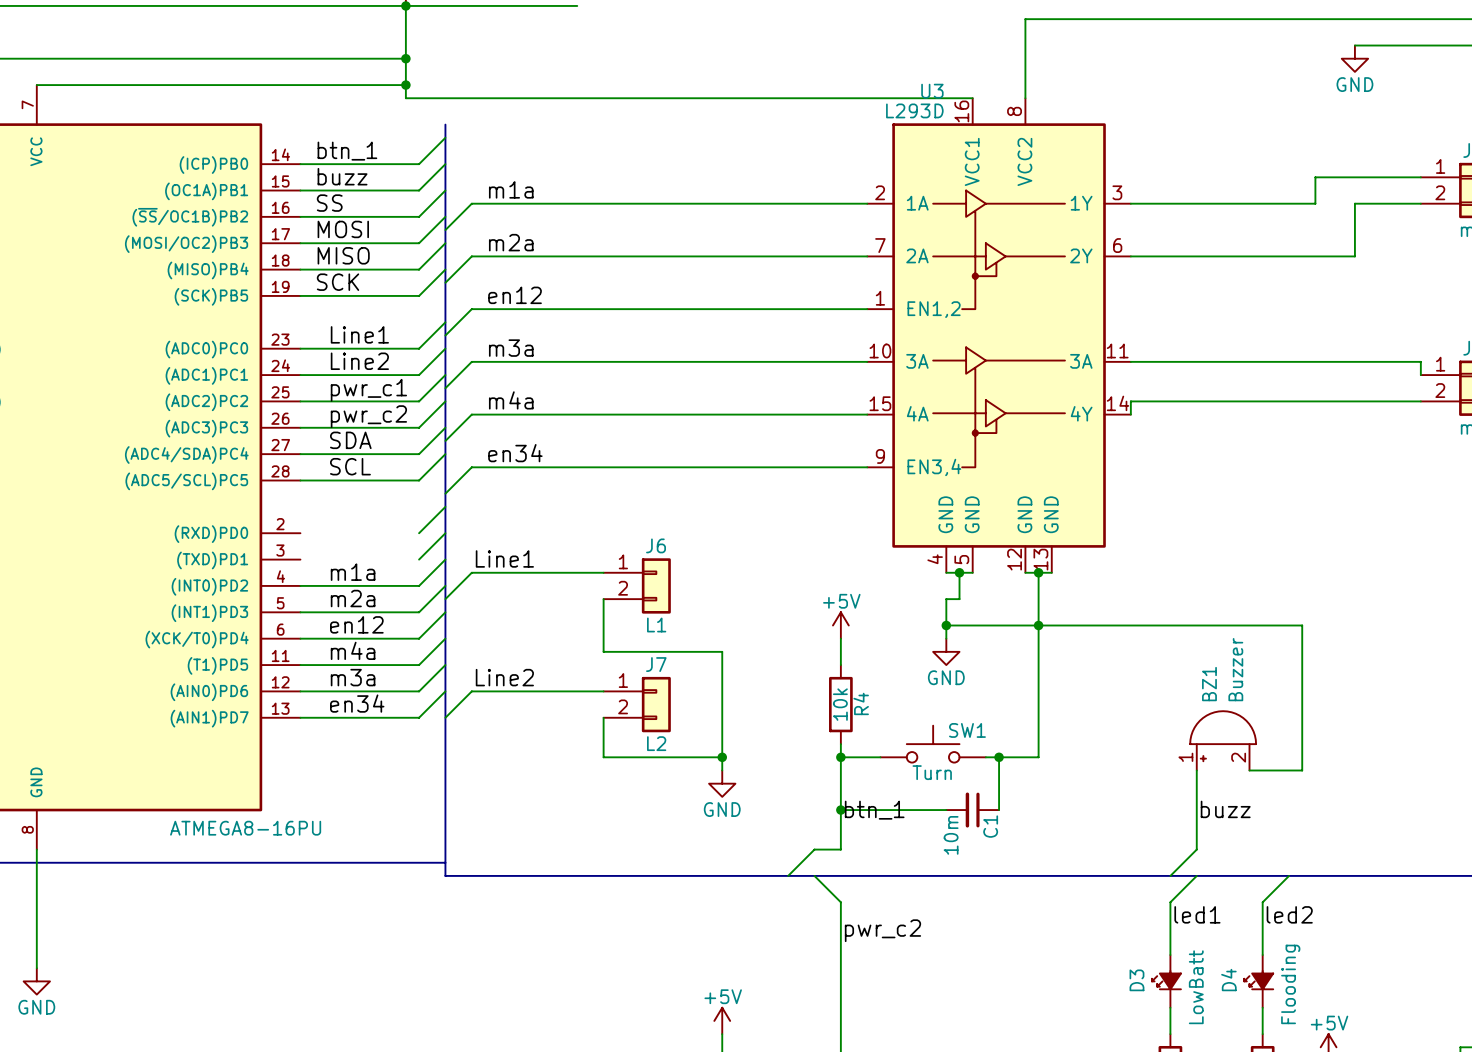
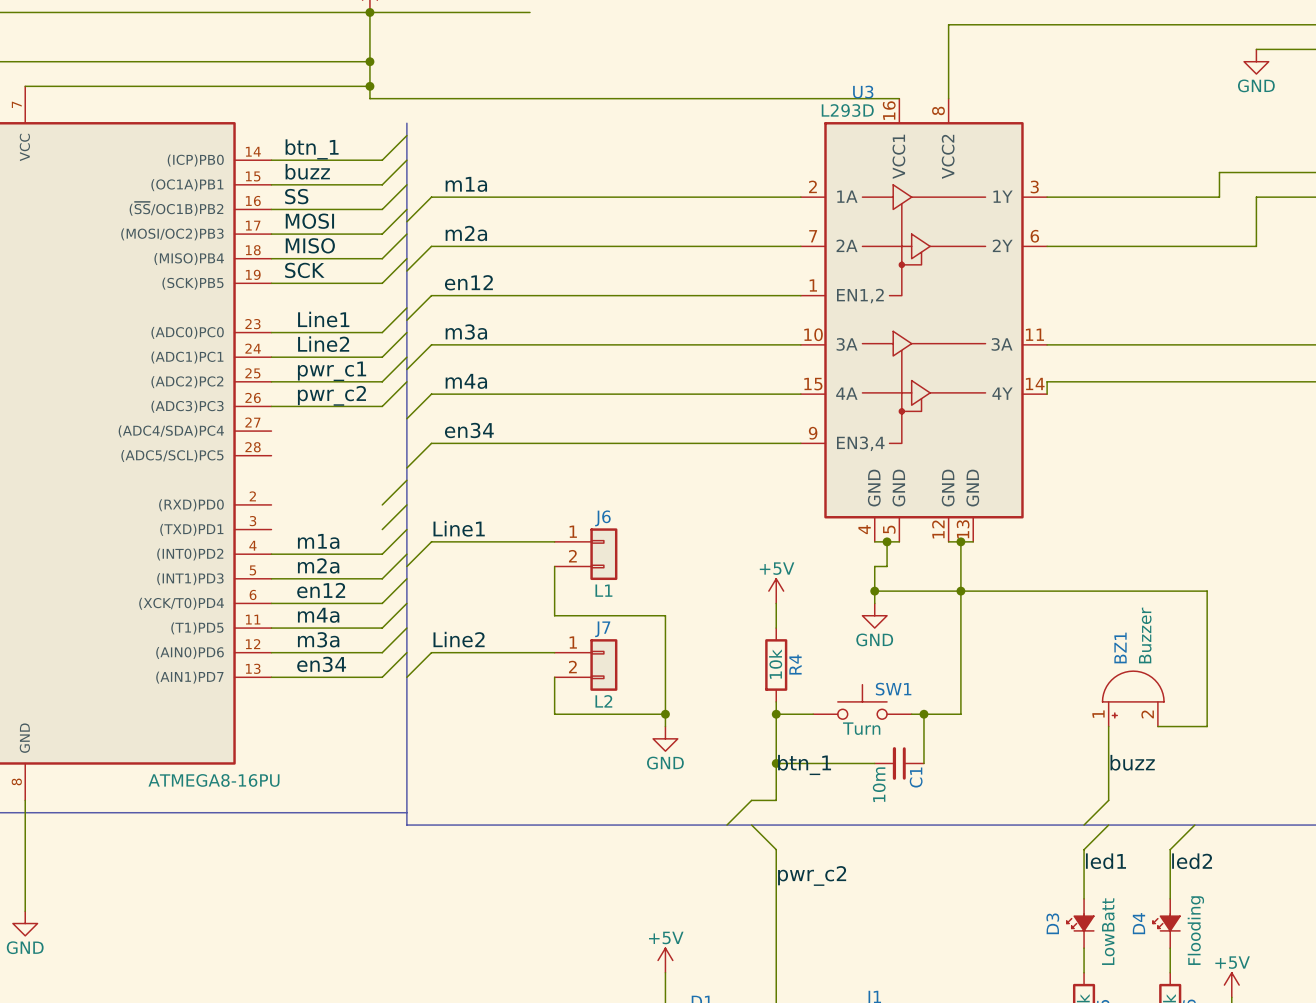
wire: (445, 427) (419, 454) (300, 454) -> none
label: SDA (350, 440) -> none
wire: (445, 454) (419, 480) (300, 480) -> none
label: SCL (350, 466) -> none

